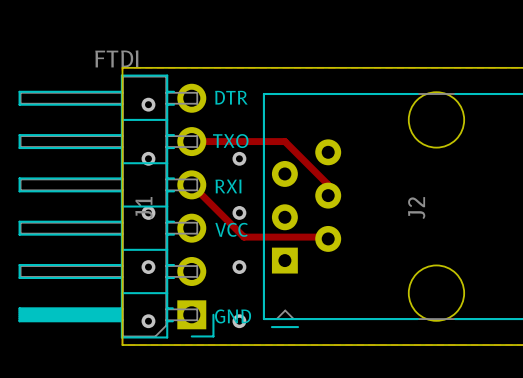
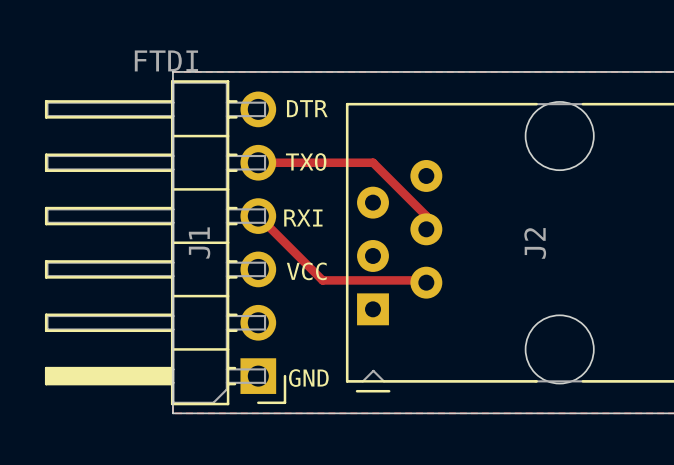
via: (148, 104) -> none
via: (148, 158) -> none
via: (239, 158) -> none
via: (148, 212) -> none
via: (239, 212) -> none
via: (148, 267) -> none
via: (239, 267) -> none
via: (148, 321) -> none
via: (239, 321) -> none

